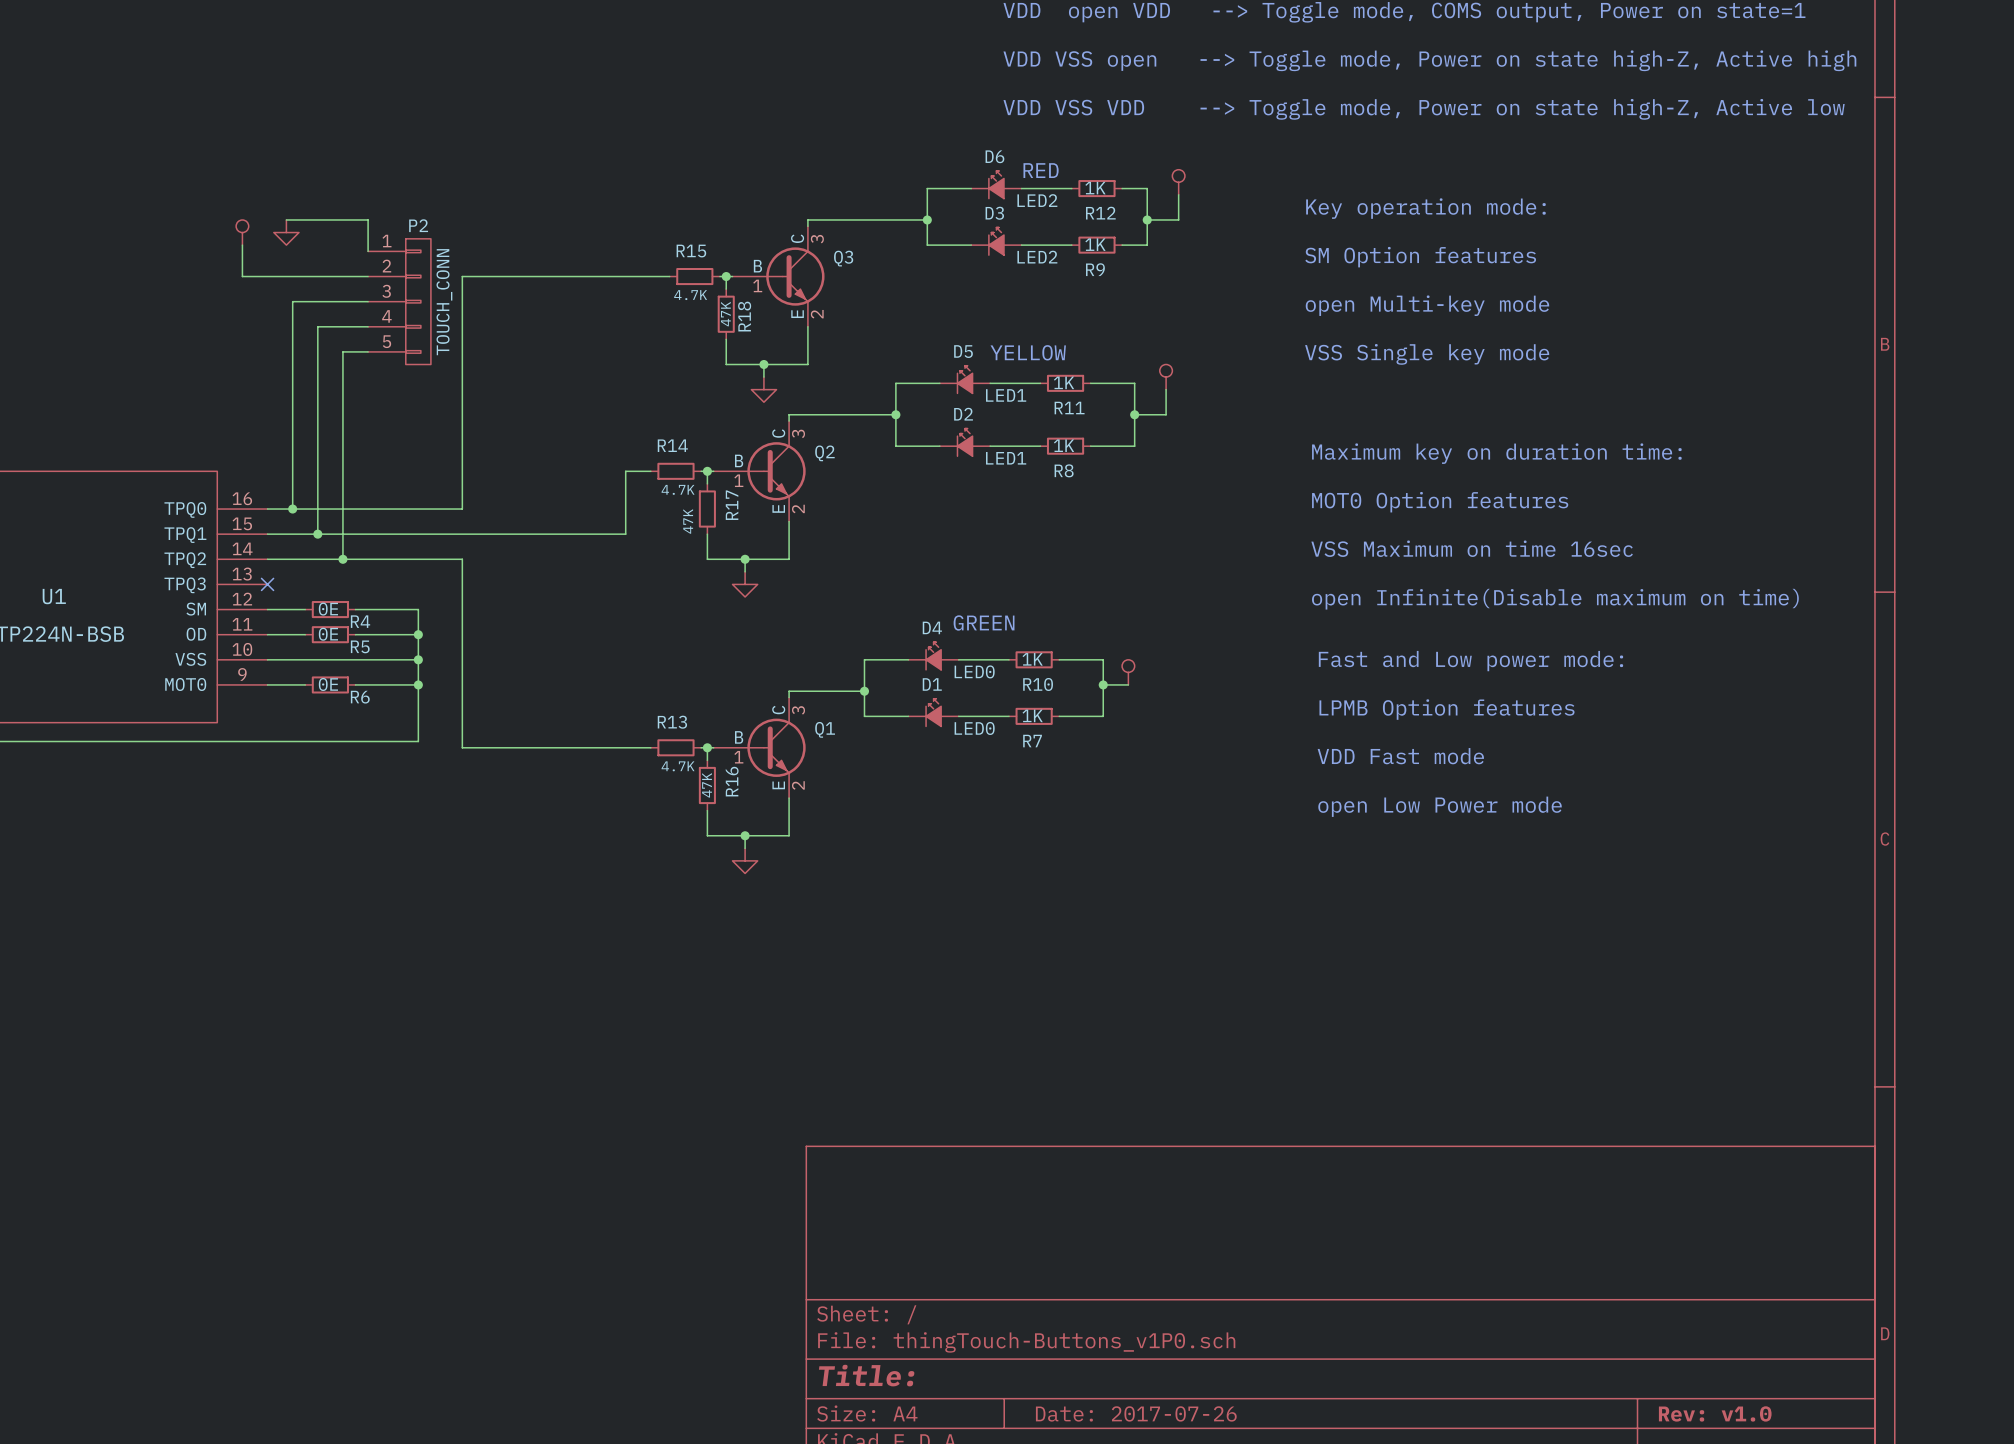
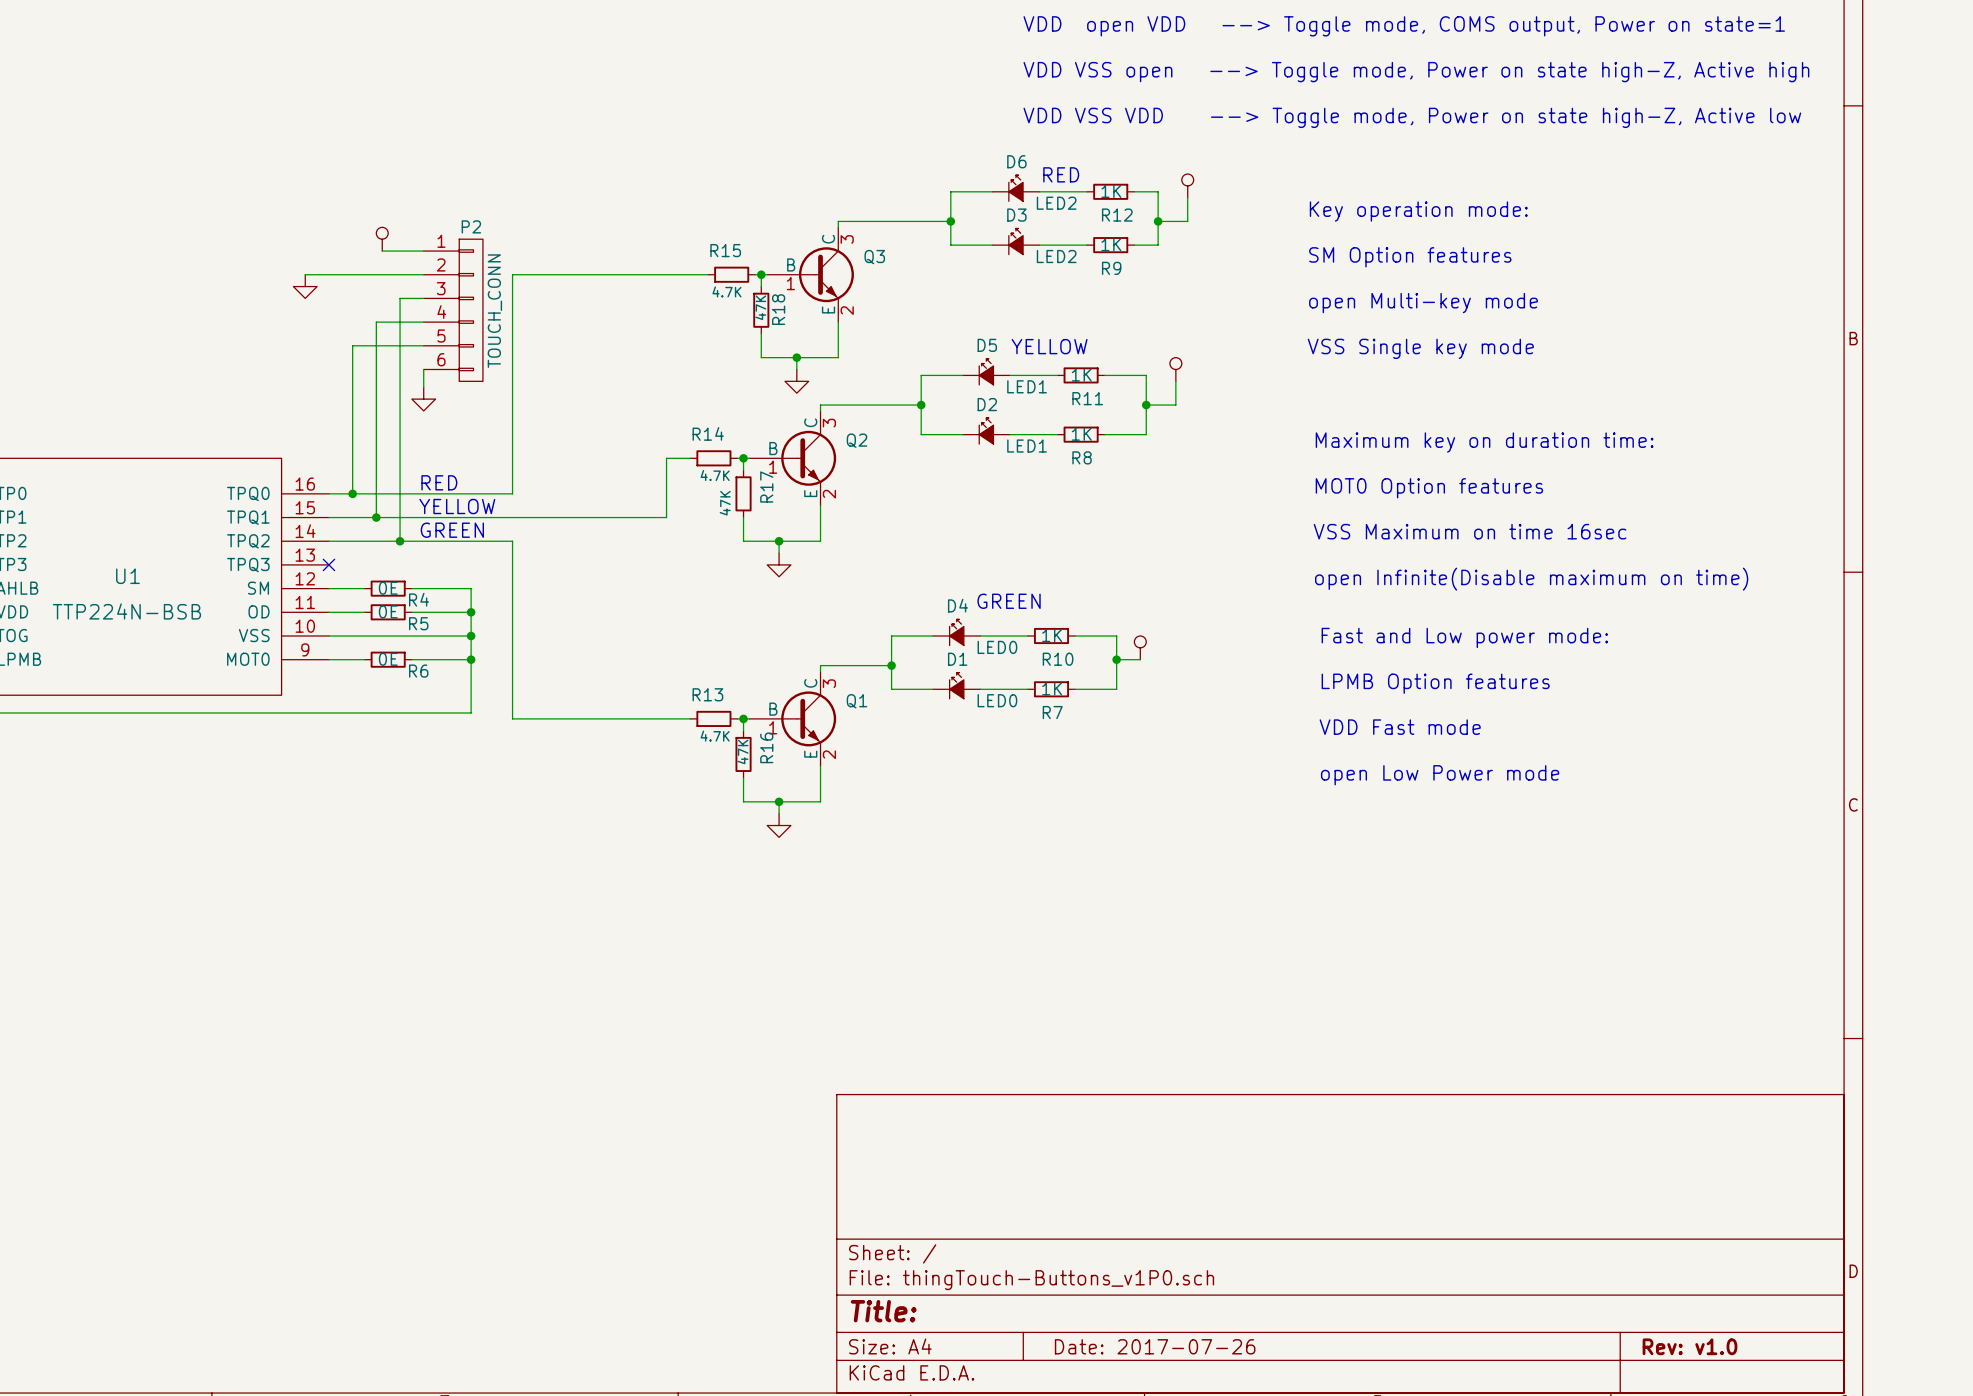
wire: (286, 219) (368, 219) (368, 251) -> (382, 251) (423, 251)
power symbol position: (242, 232) -> (382, 239)
power symbol position: (286, 232) -> (305, 286)
P2 symbol: [368, 238, 431, 365] -> [423, 239, 483, 382]
wire: (242, 245) (242, 276) -> none
wire: (342, 301) (292, 301) (292, 351) -> (400, 298) (400, 345) (352, 345)
wire: none -> (423, 369) (423, 387)
power symbol: none -> (423, 399)
text: none -> RED (439, 482)
text: none -> YELLOW (457, 506)
text: none -> GREEN (452, 530)

